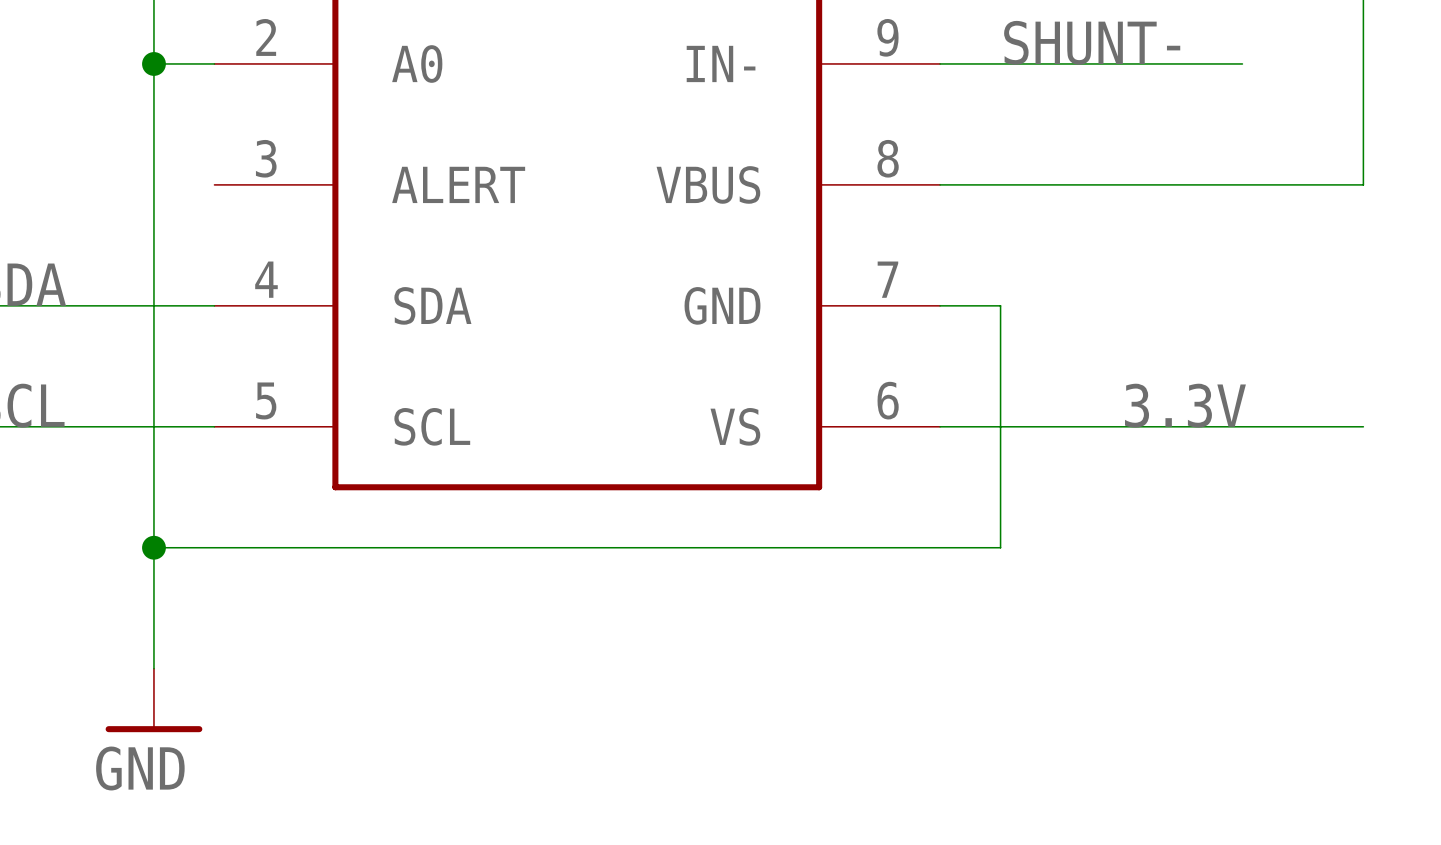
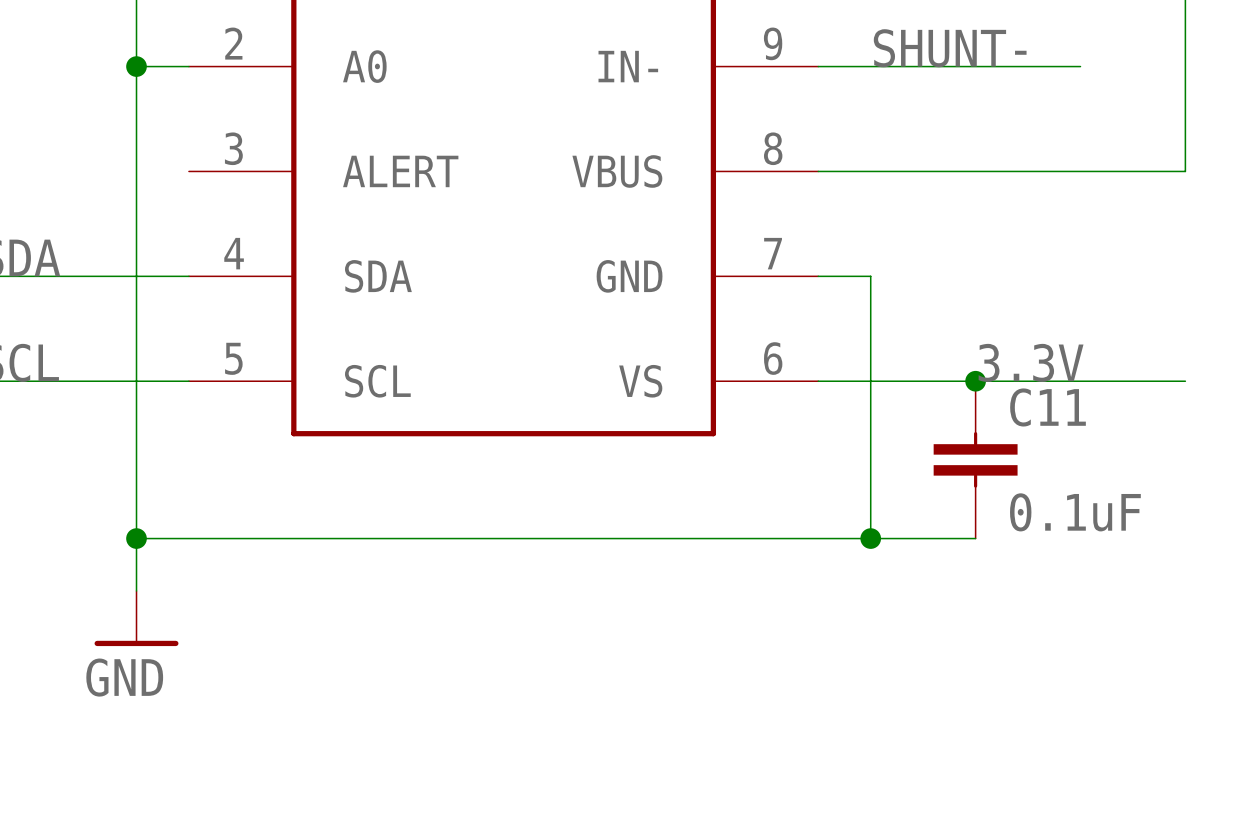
junction: none -> (975, 381)
C11: none -> 0.1uF (975, 459)
wire: (153, 547) (1000, 547) -> (870, 538) (870, 486)
junction position: (153, 547) -> (136, 538)
wire: none -> (136, 538) (975, 538)
junction: none -> (870, 538)

